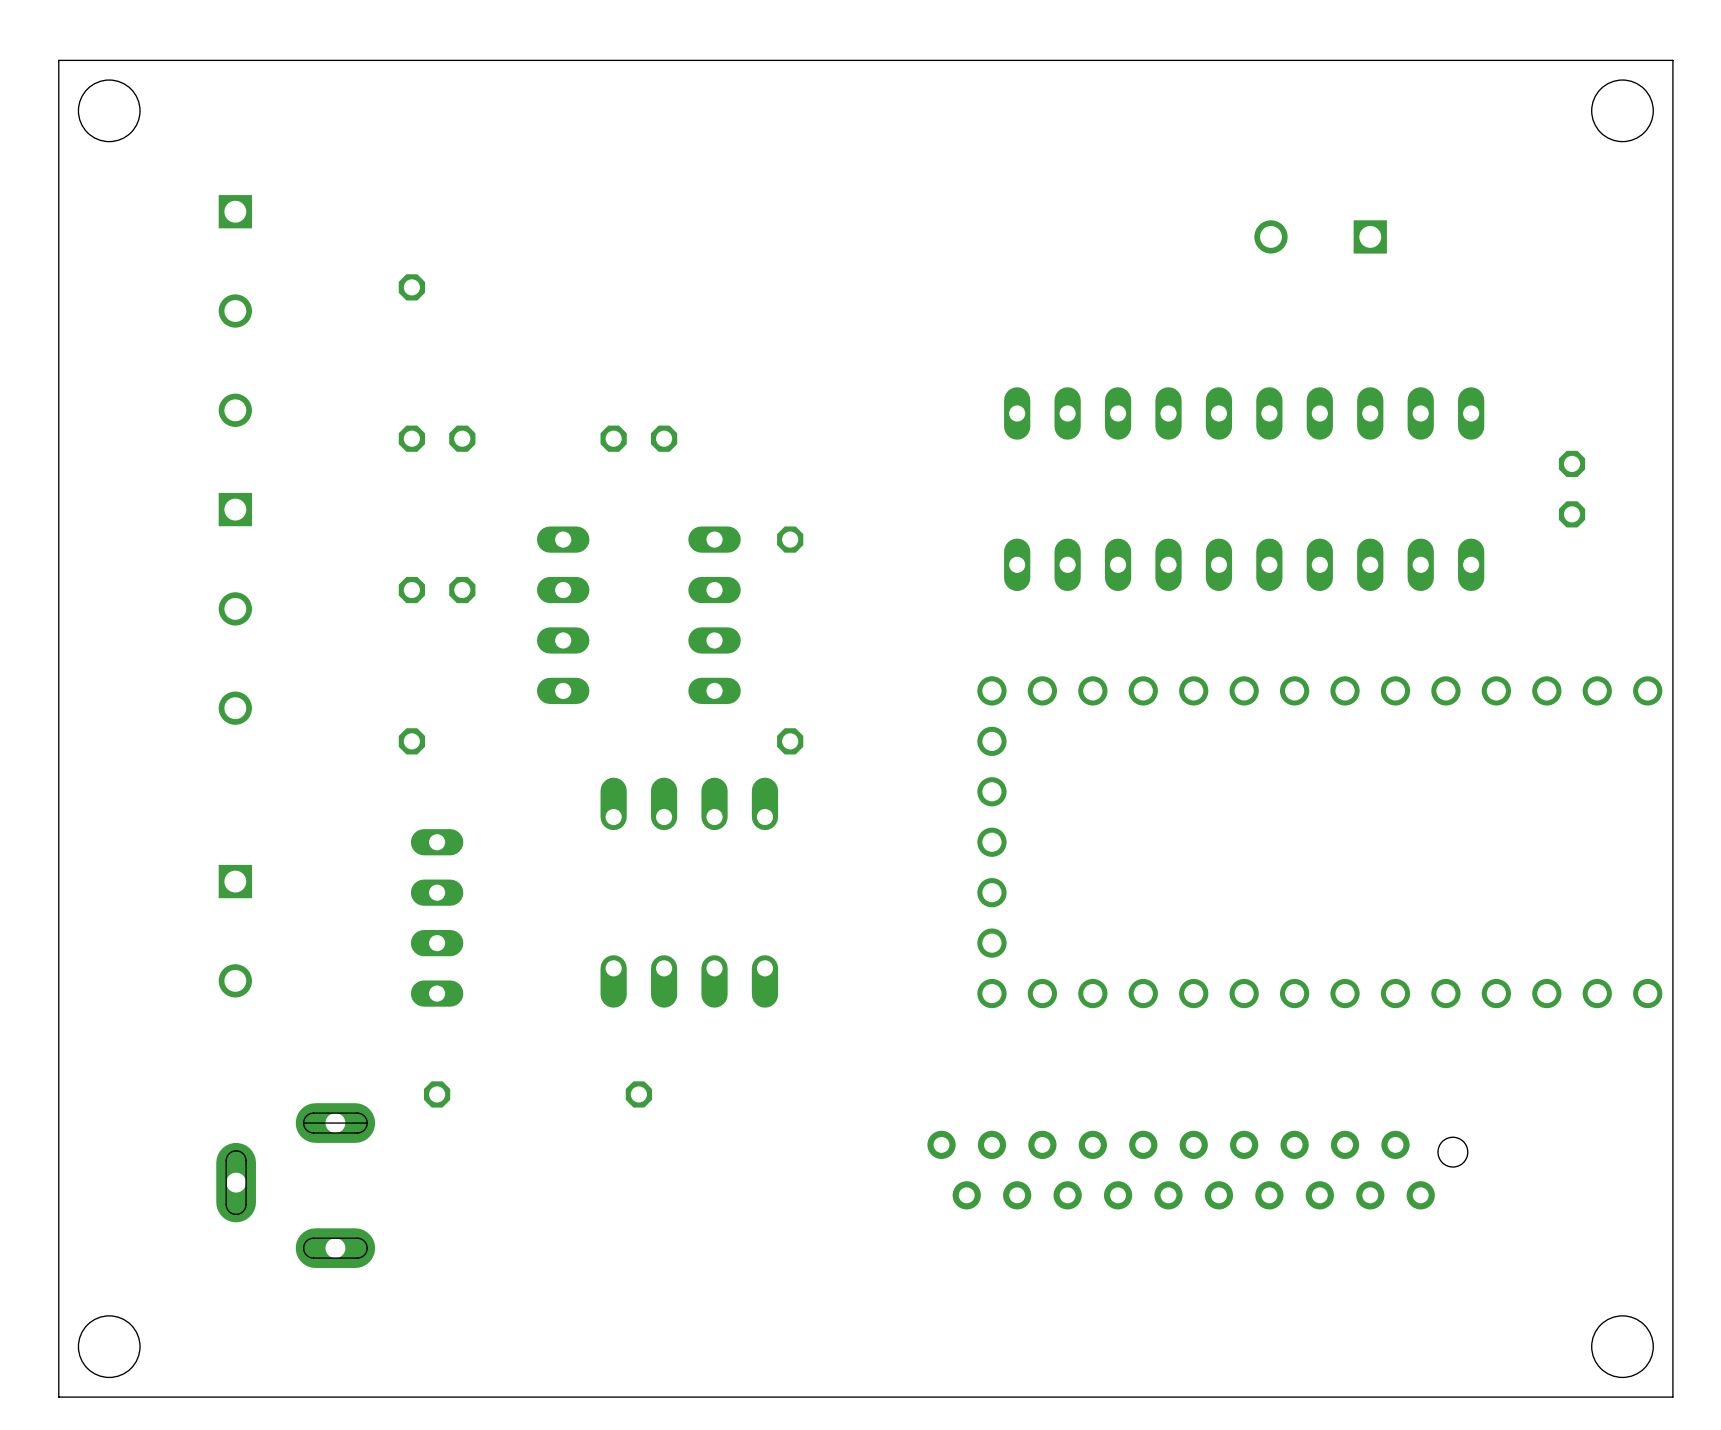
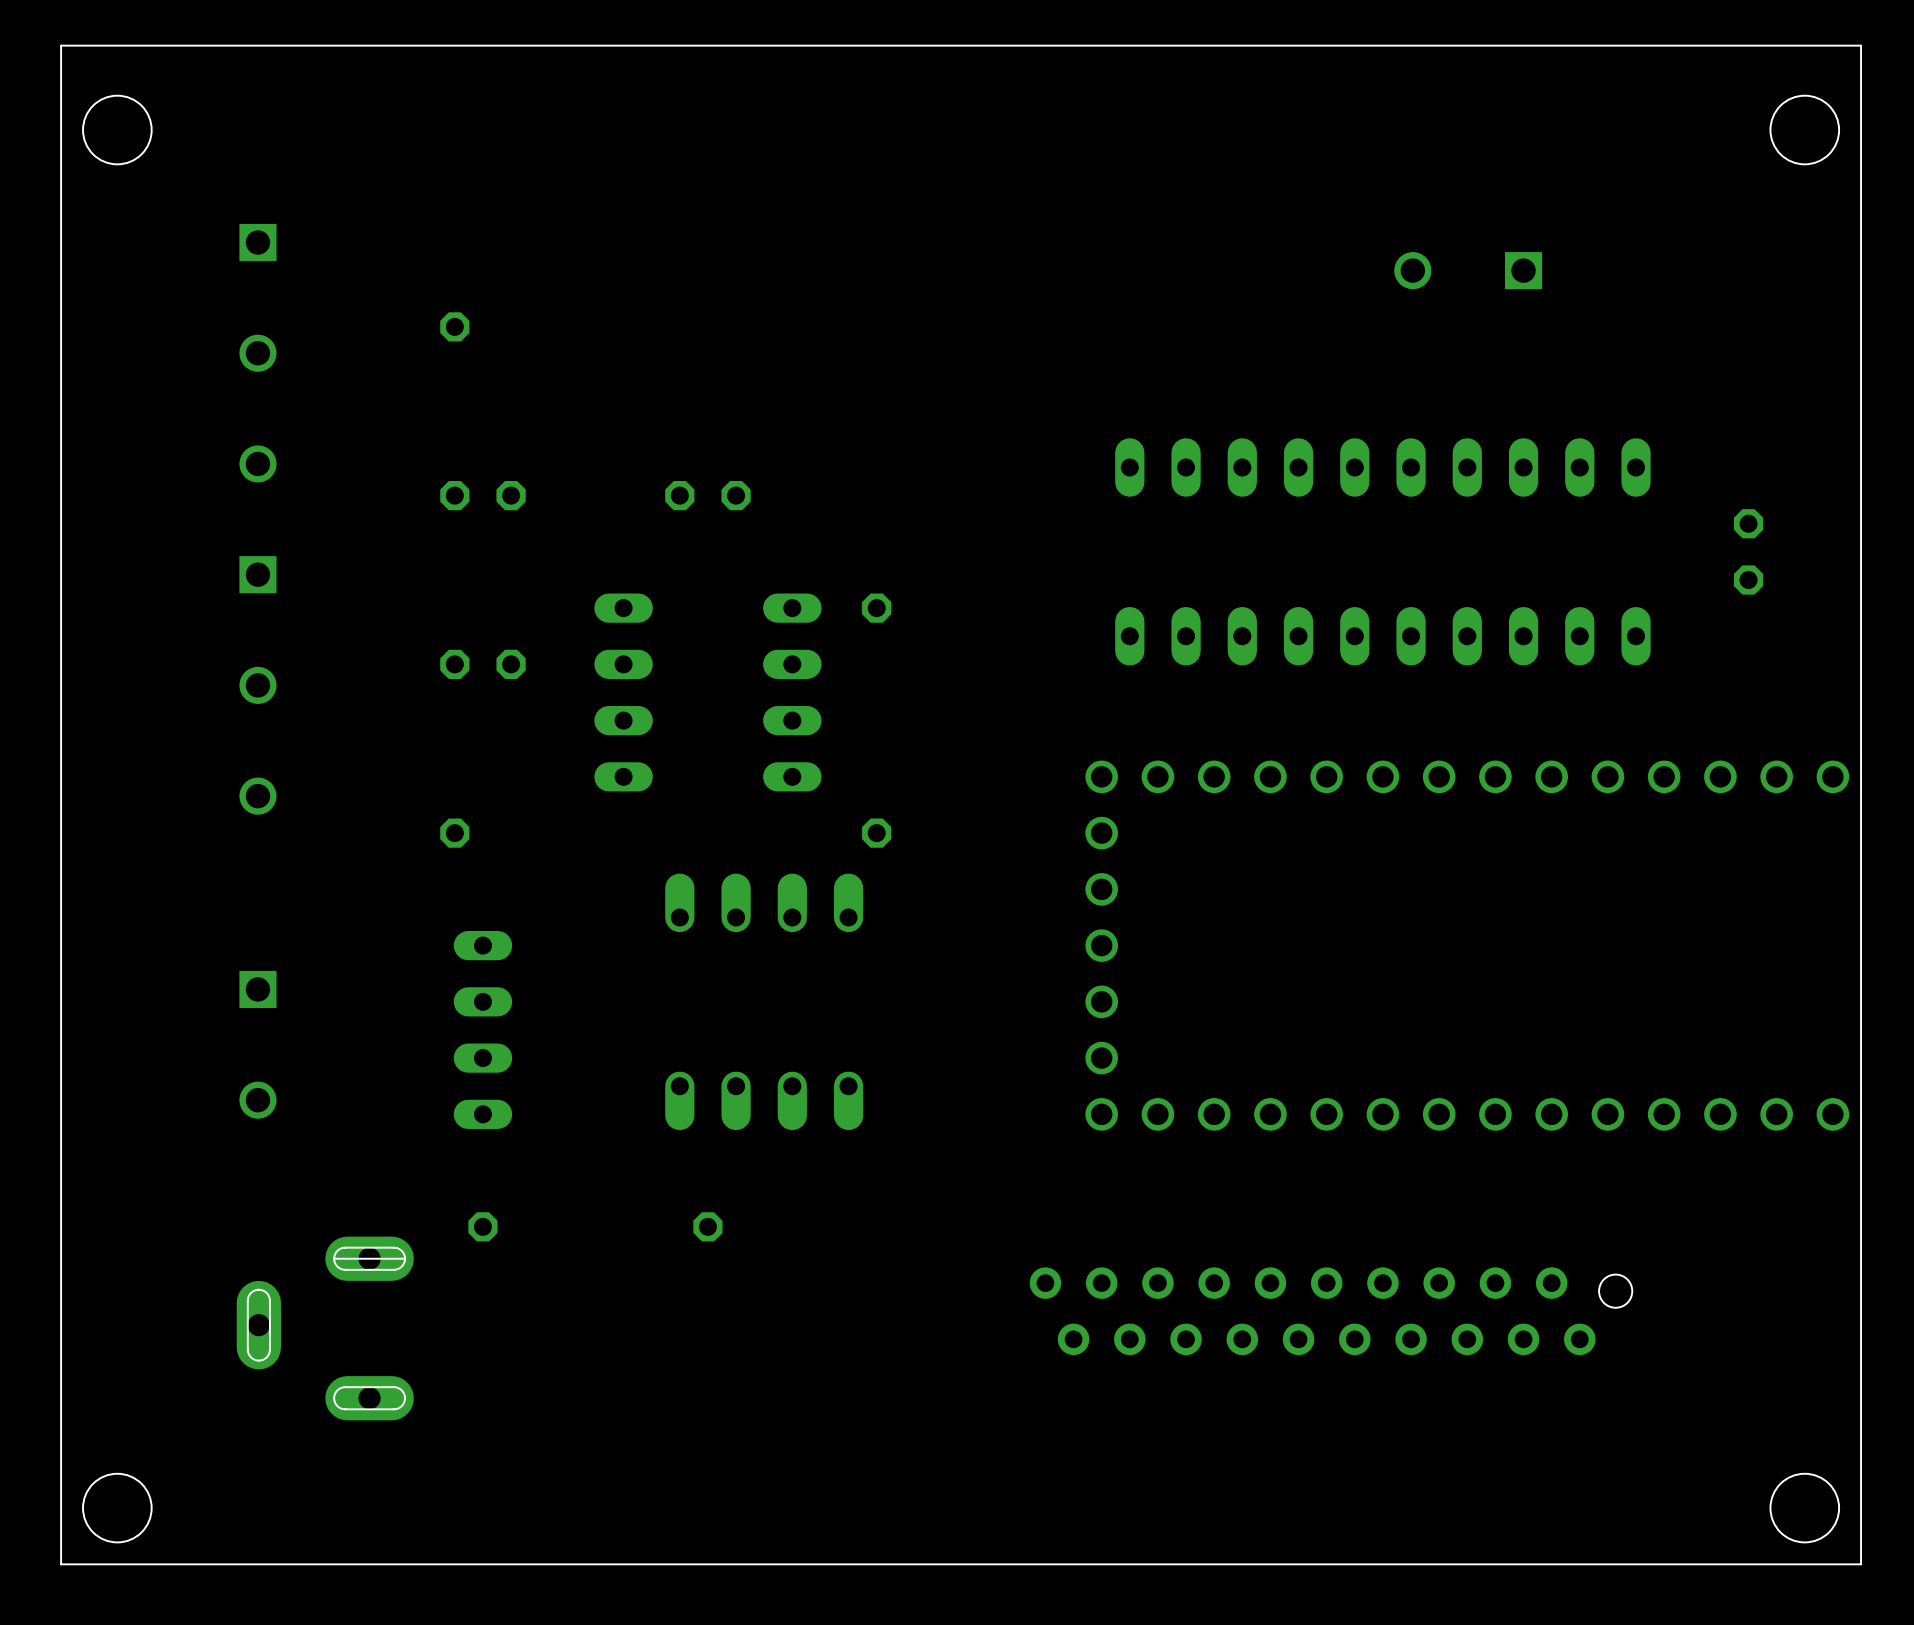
board edge: (1672, 60) (58, 60) -> (1861, 73) (1861, 45) (61, 45) (61, 73)

